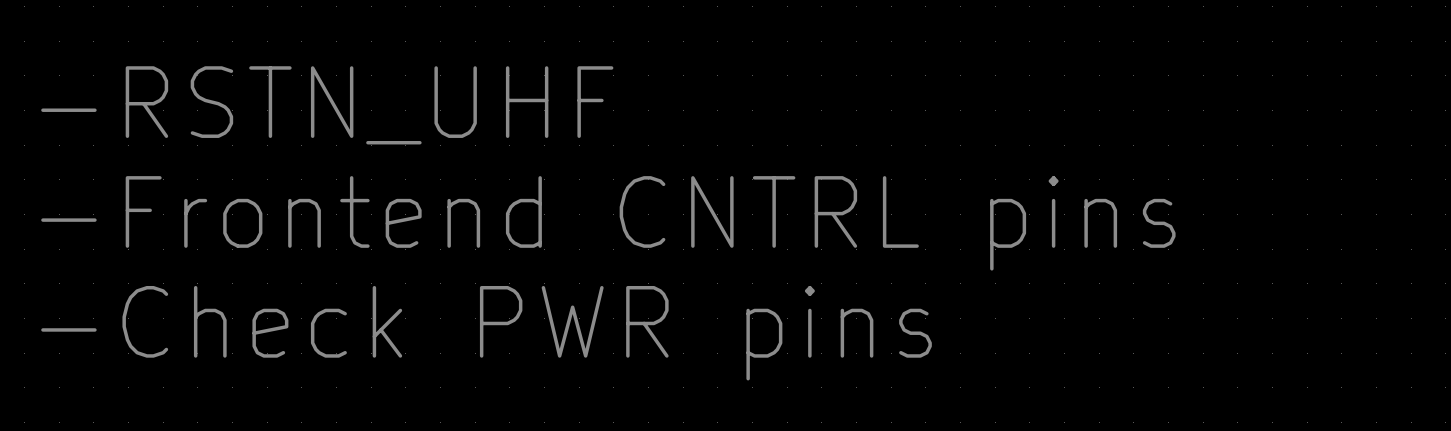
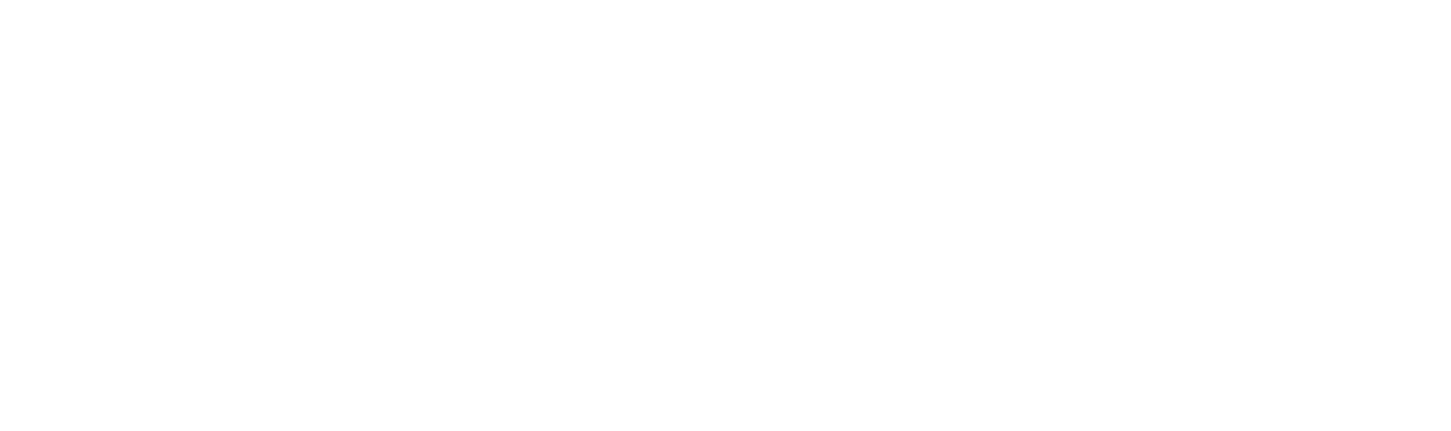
text: -RSTN_UHF (327, 105) -> none
text: -Frontend CNTRL pins (608, 223) -> none
text: -Check PWR pins (486, 333) -> none

